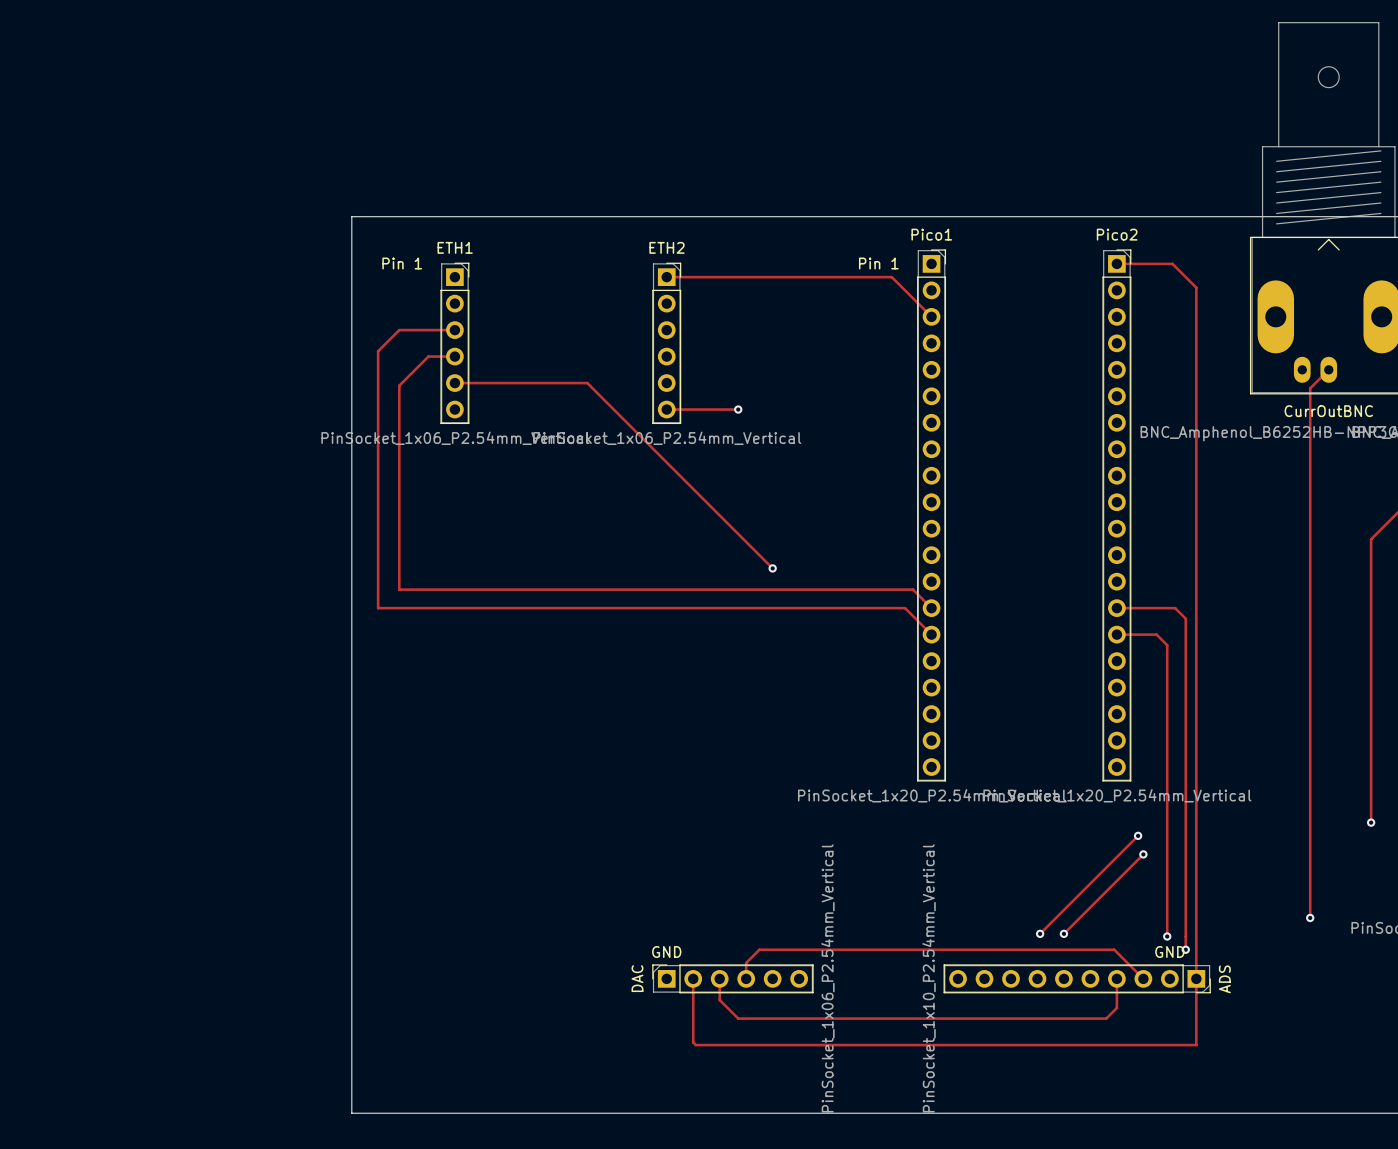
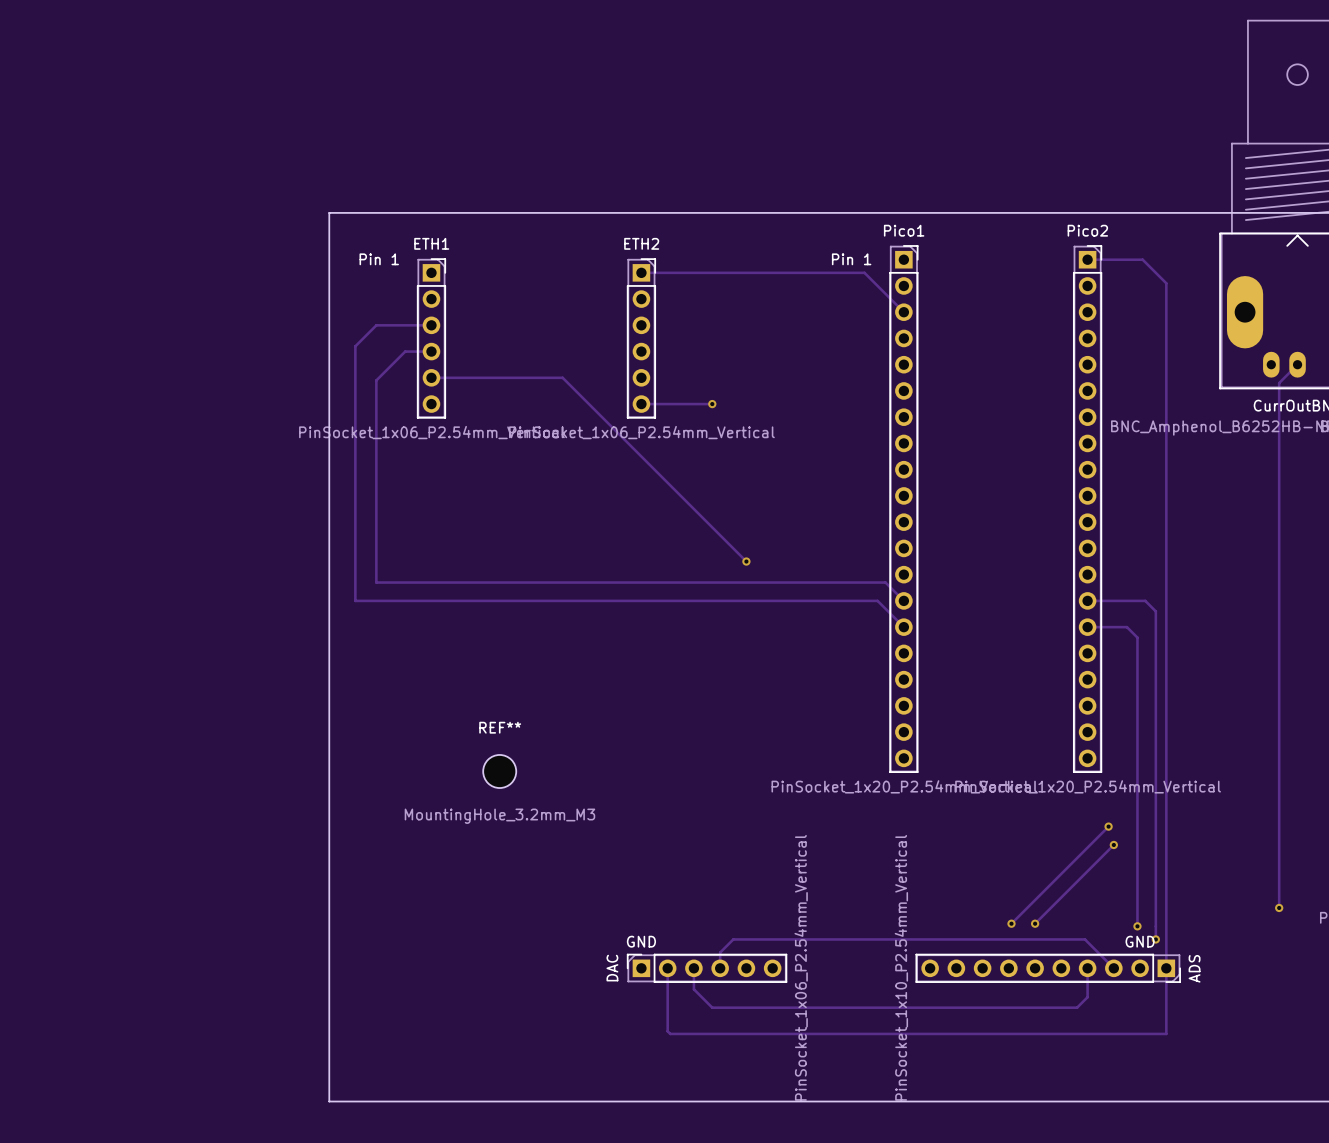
REF**: none -> MountingHole_3.2mm_M3 (499, 771)

